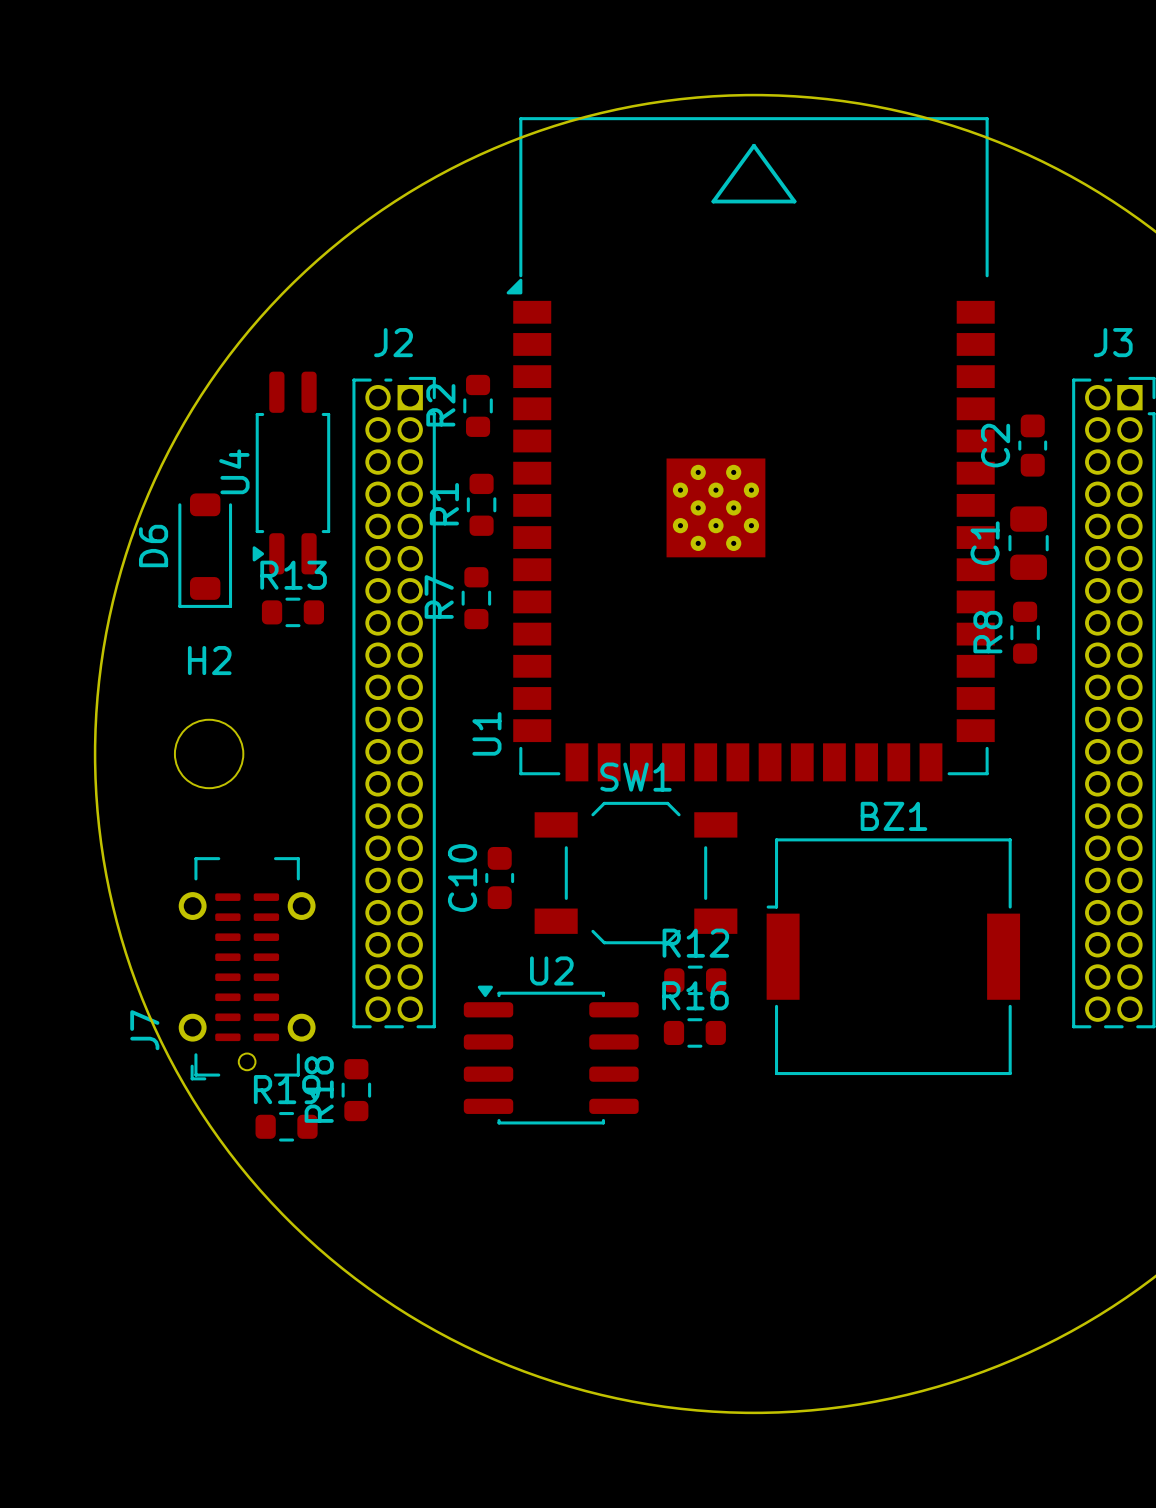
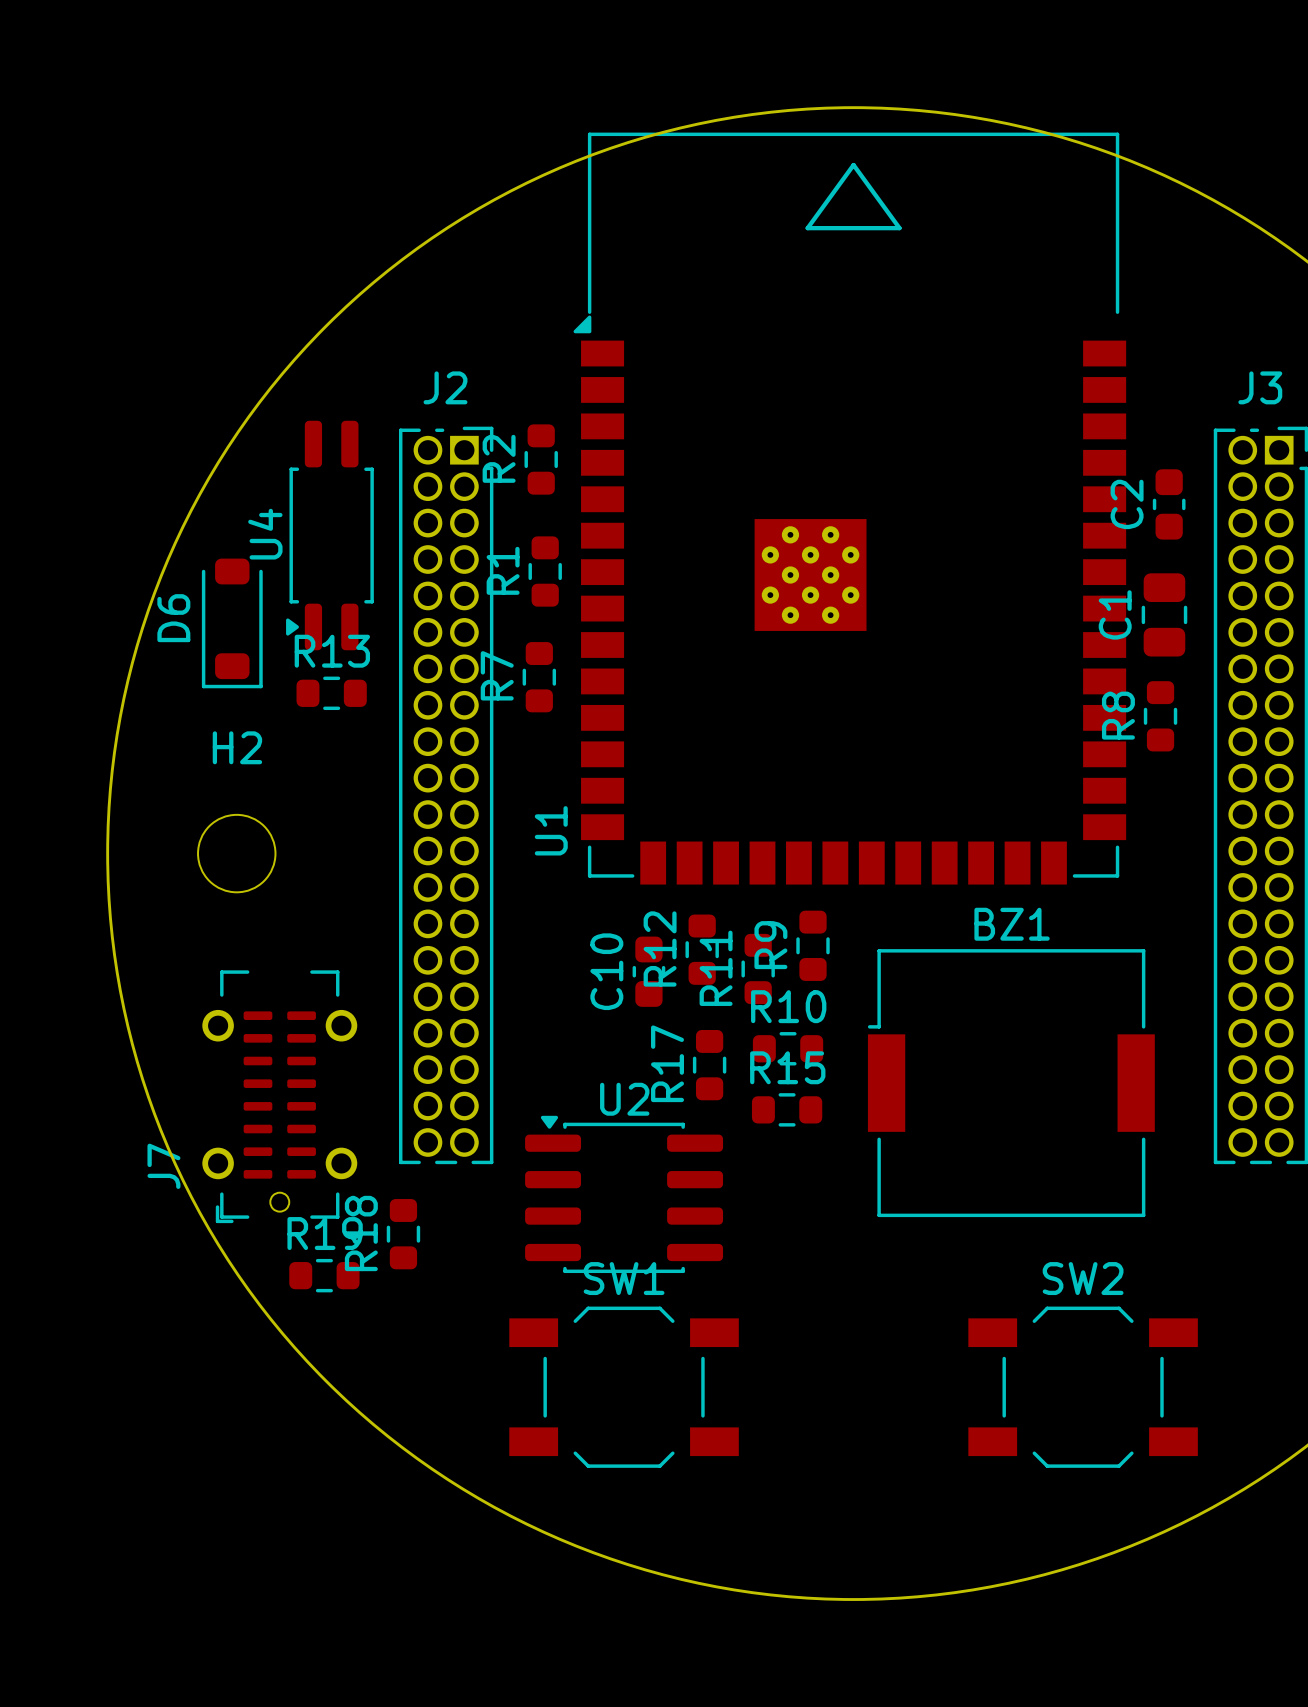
R9: none -> (813, 945)
R12: none -> (702, 949)
R11: none -> (758, 968)
SW1 position: (635, 873) -> (624, 1387)
C10 position: (499, 878) -> (648, 971)
R10: none -> (788, 1048)
R17: none -> (709, 1065)
R12 name: R12 (695, 943) -> R15 (787, 1067)
R16: (694, 1032) -> none
SW2: none -> (1083, 1387)

